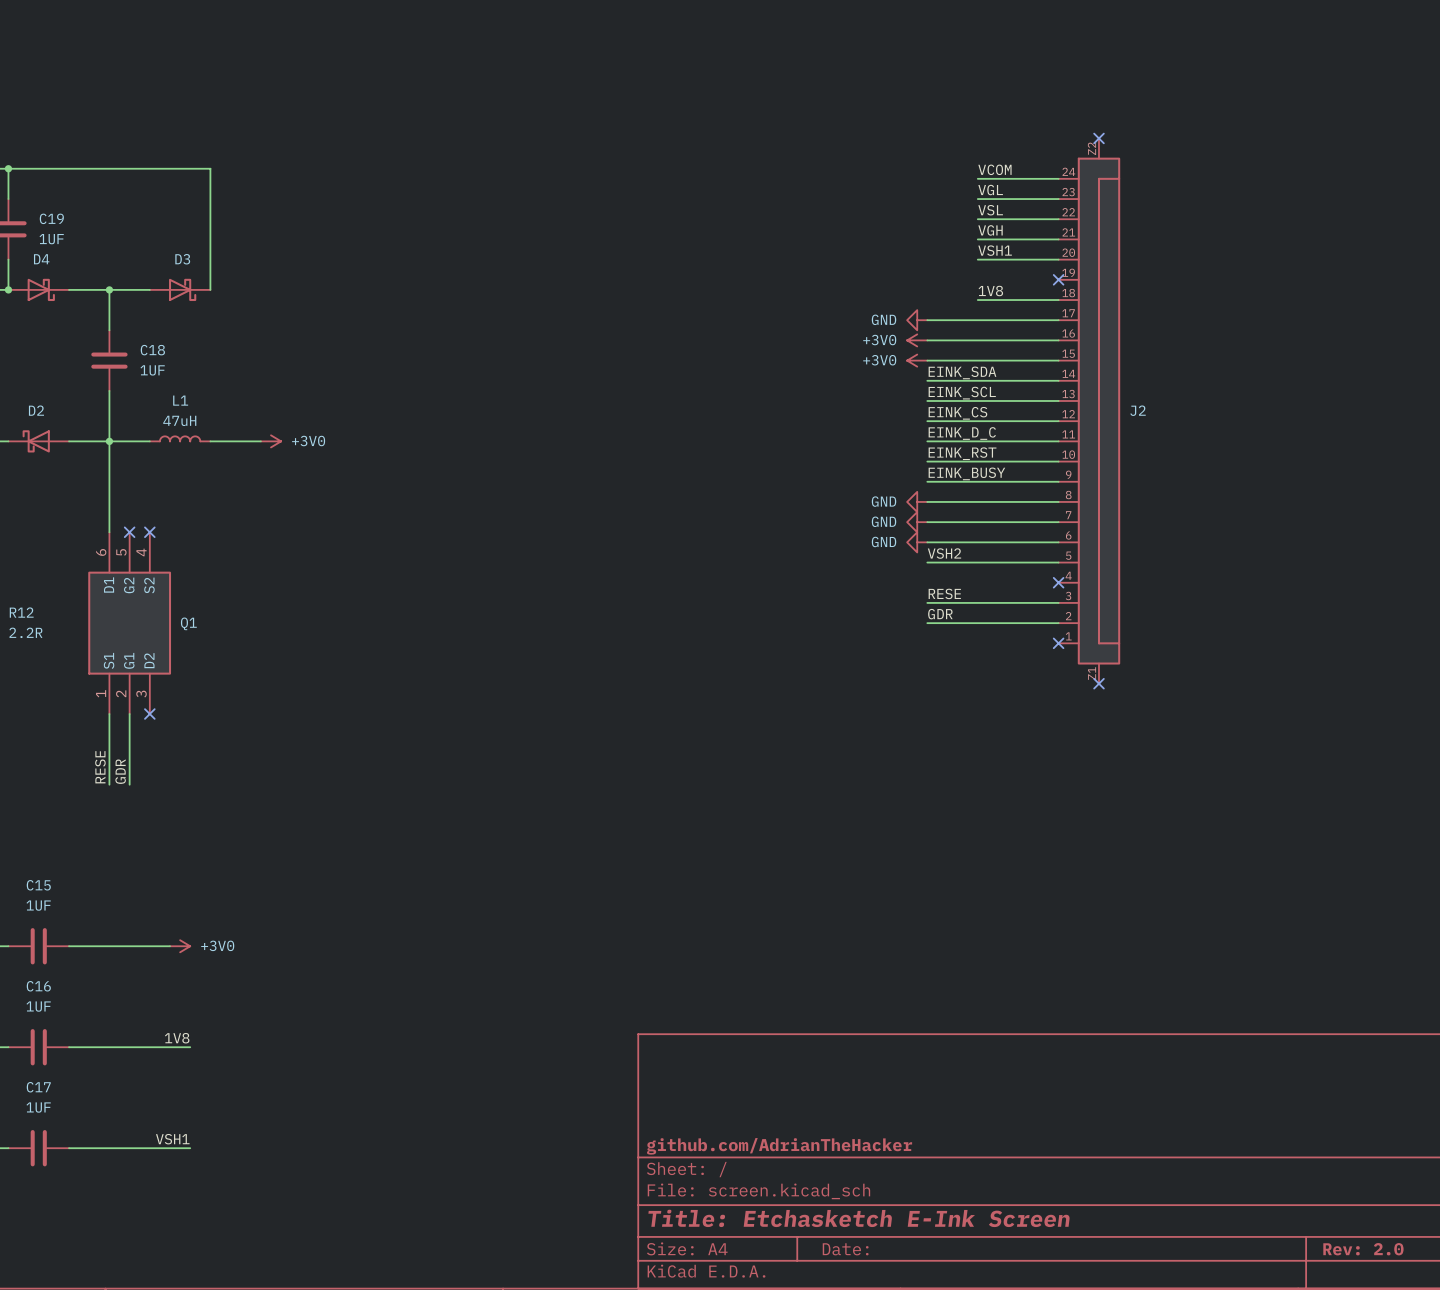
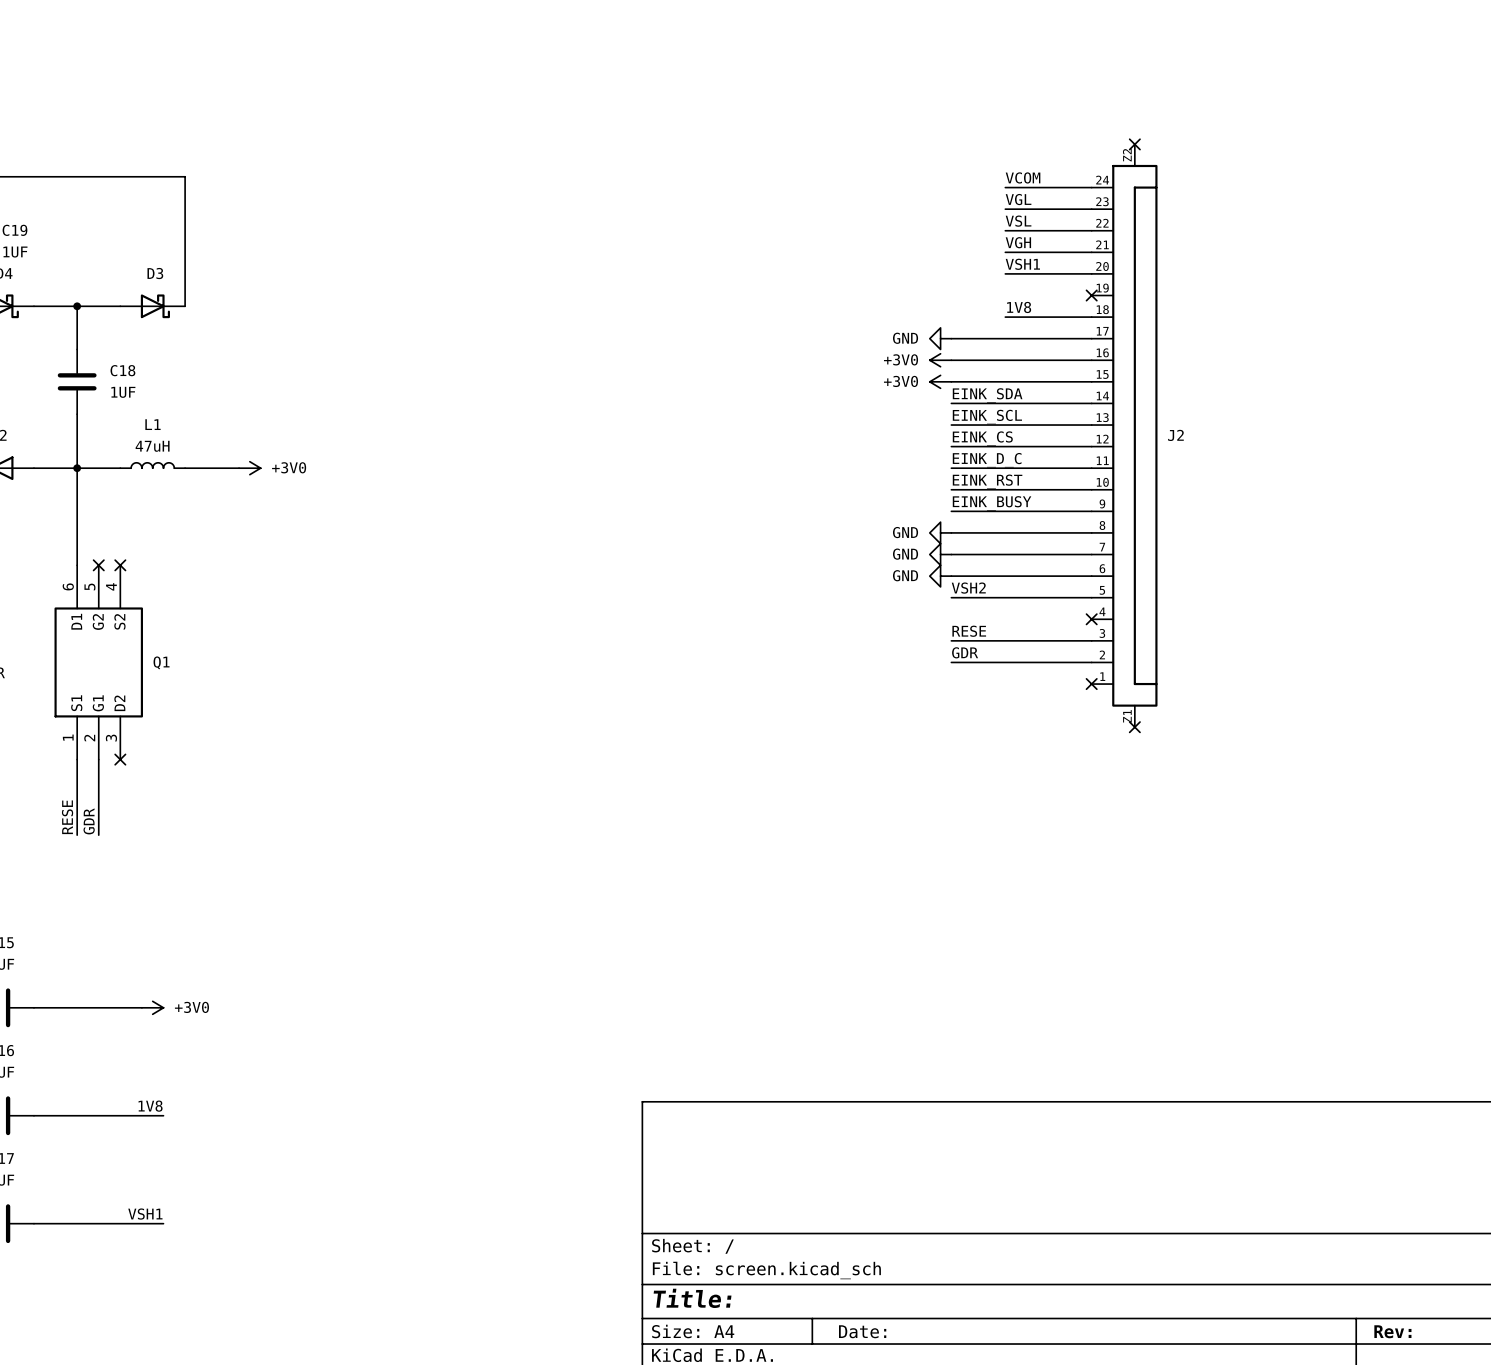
title block: github.com/AdrianTheHacker (779, 1146) -> none
title block: Title: Etchasketch E-Ink Screen (859, 1218) -> Title: (692, 1298)
title block: Rev: 2.0 (1363, 1249) -> Rev: (1392, 1331)

